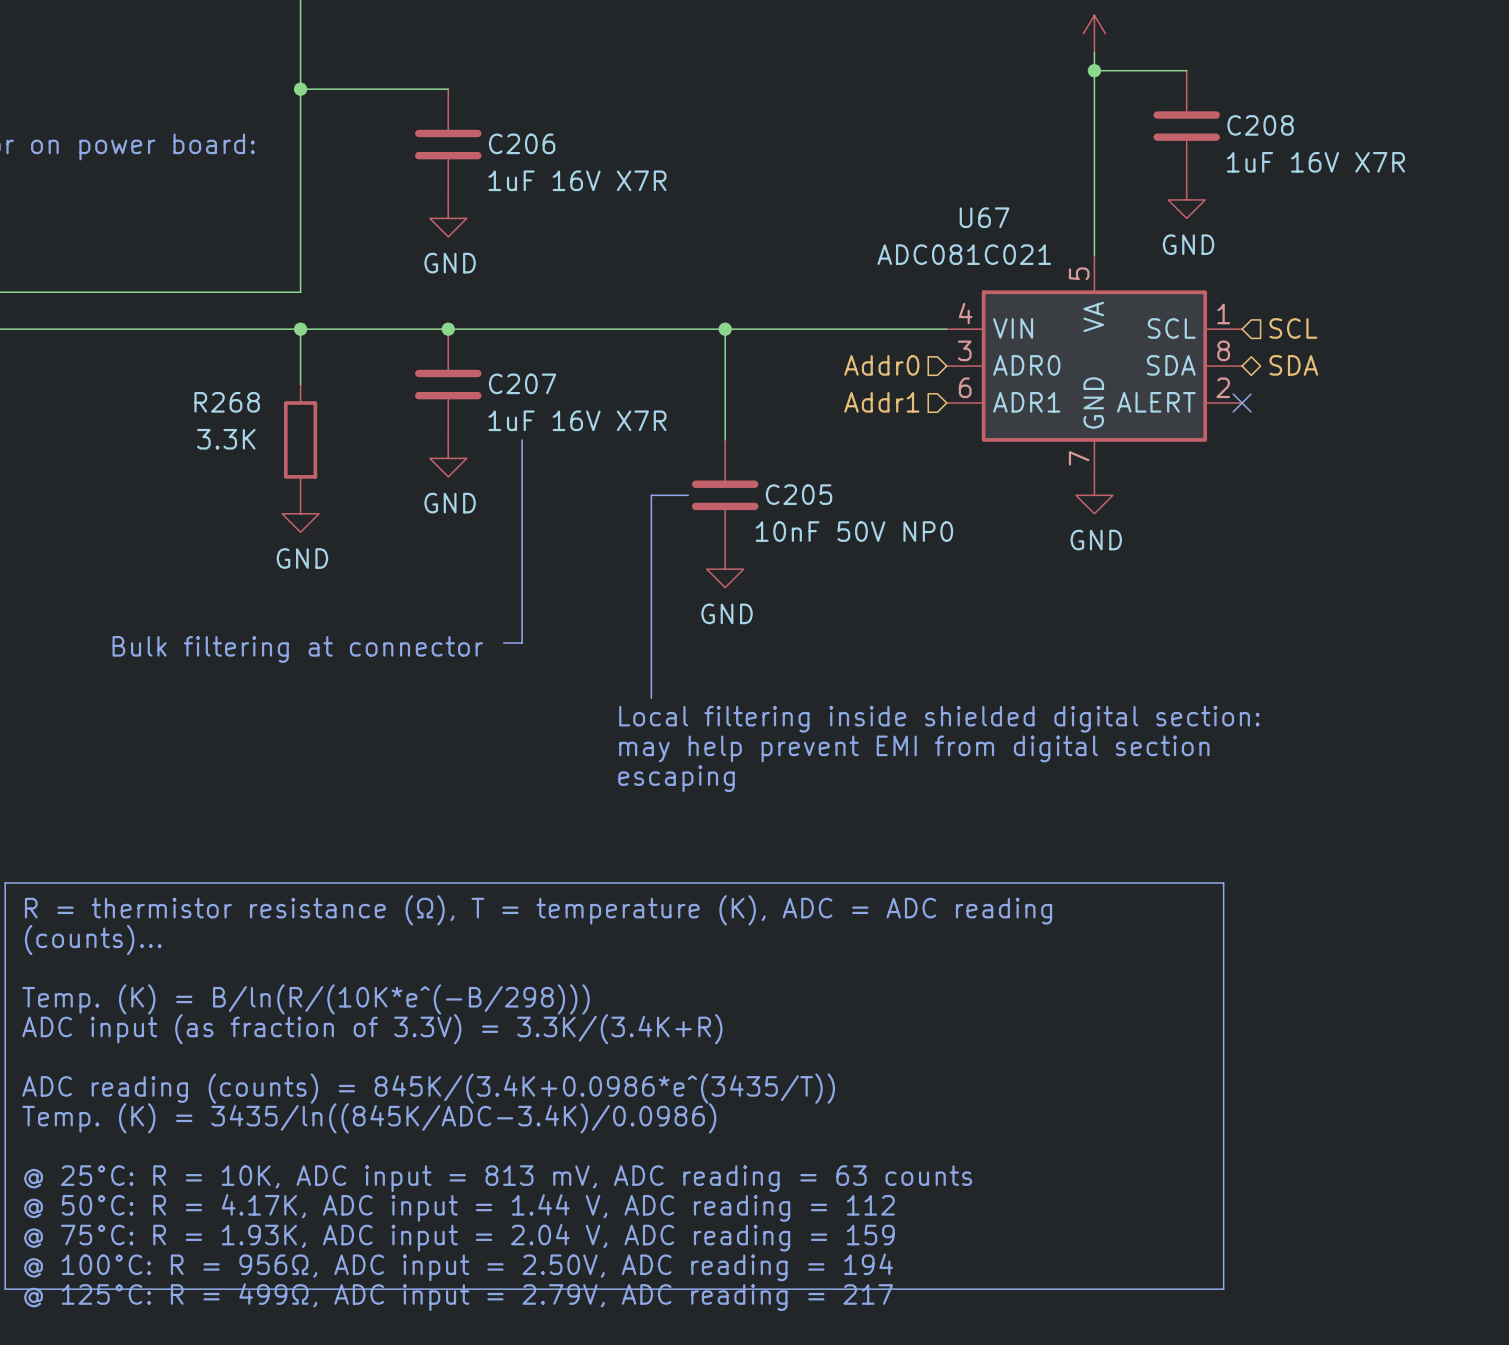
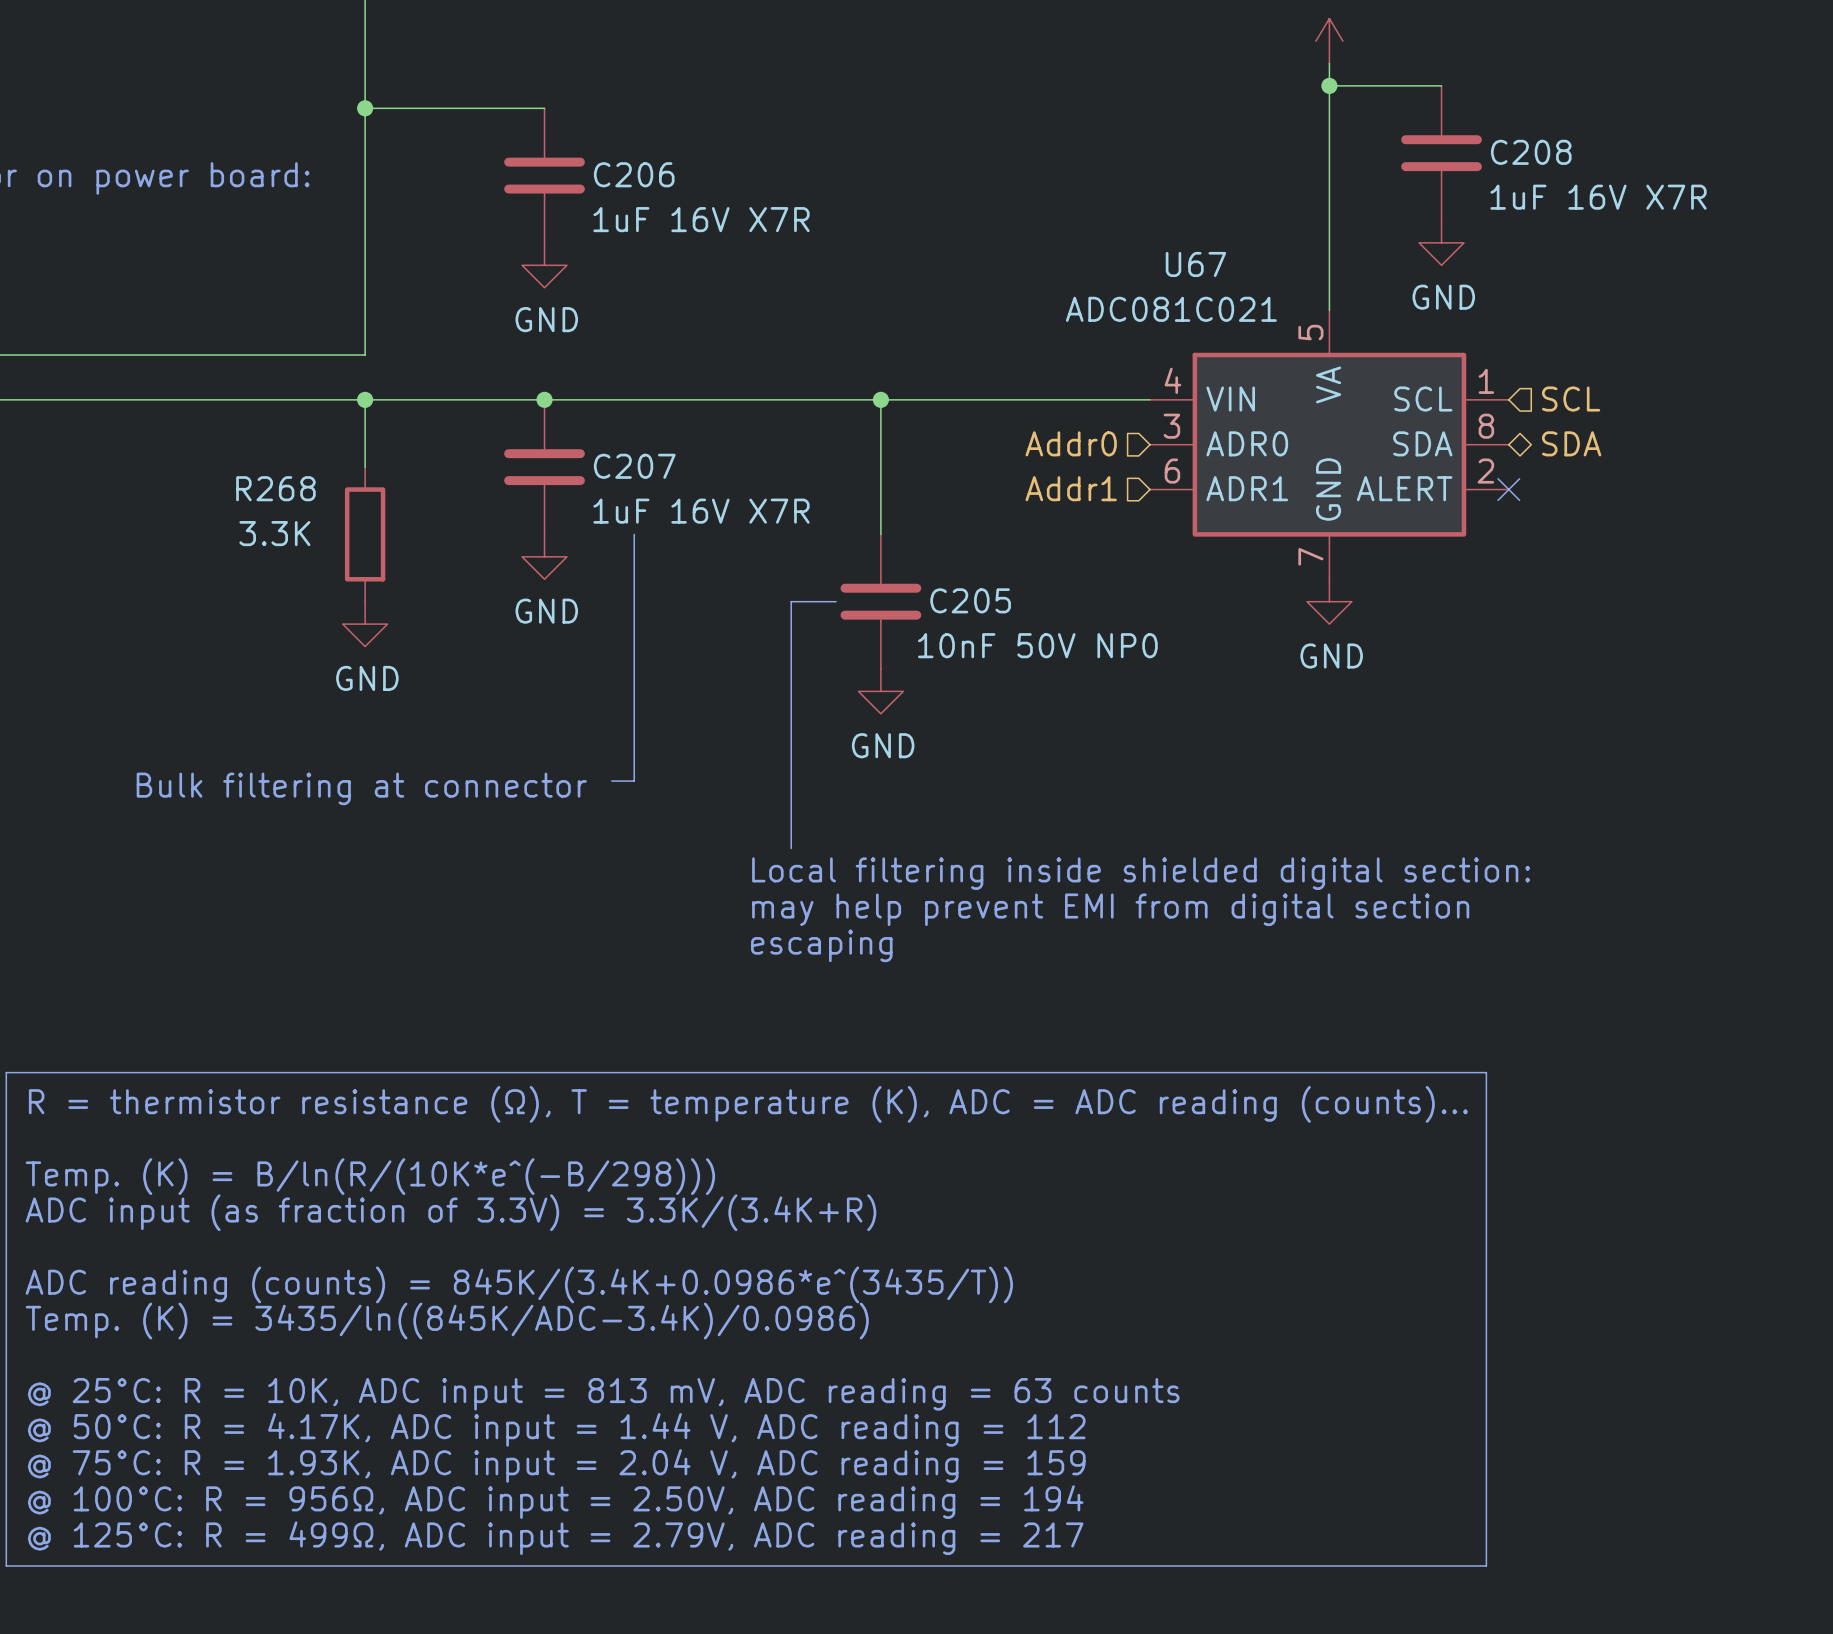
text: R = thermistor resistance (Ω), T = temperature (K), ADC = ADC reading (538, 910) -> R = thermistor resistance (Ω), T = temperature (K), ADC = ADC reading (counts)... (748, 1104)
text: (counts)... (93, 939) -> none
text position: Temp. (K) = B/ln(R/(10K*e^(-B/298))) (306, 999) -> Temp. (K) = B/ln(R/(10K*e^(-B/298))) (370, 1176)
text position: ADC input (as fraction of 3.3V) = 3.3K/(3.4K+R) (372, 1029) -> ADC input (as fraction of 3.3V) = 3.3K/(3.4K+R) (450, 1212)
text position: ADC reading (counts) = 845K/(3.4K+0.0986*e^(3435/T)) (428, 1088) -> ADC reading (counts) = 845K/(3.4K+0.0986*e^(3435/T)) (519, 1284)
text position: Temp. (K) = 3435/ln((845K/ADC-3.4K)/0.0986) (369, 1118) -> Temp. (K) = 3435/ln((845K/ADC-3.4K)/0.0986) (447, 1321)
text position: @ 25°C: R = 10K, ADC input = 813 mV, ADC reading = 63 counts (498, 1178) -> @ 25°C: R = 10K, ADC input = 813 mV, ADC reading = 63 counts (603, 1394)
text position: @ 50°C: R = 4.17K, ADC input = 1.44 V, ADC reading = 112 (459, 1207) -> @ 50°C: R = 4.17K, ADC input = 1.44 V, ADC reading = 112 (556, 1429)
text position: @ 75°C: R = 1.93K, ADC input = 2.04 V, ADC reading = 159 (459, 1237) -> @ 75°C: R = 1.93K, ADC input = 2.04 V, ADC reading = 159 (556, 1465)
text position: @ 100°C: R = 956Ω, ADC input = 2.50V, ADC reading = 194 (458, 1267) -> @ 100°C: R = 956Ω, ADC input = 2.50V, ADC reading = 194 (555, 1502)
text position: @ 125°C: R = 499Ω, ADC input = 2.79V, ADC reading = 217 (458, 1297) -> @ 125°C: R = 499Ω, ADC input = 2.79V, ADC reading = 217 (555, 1538)

